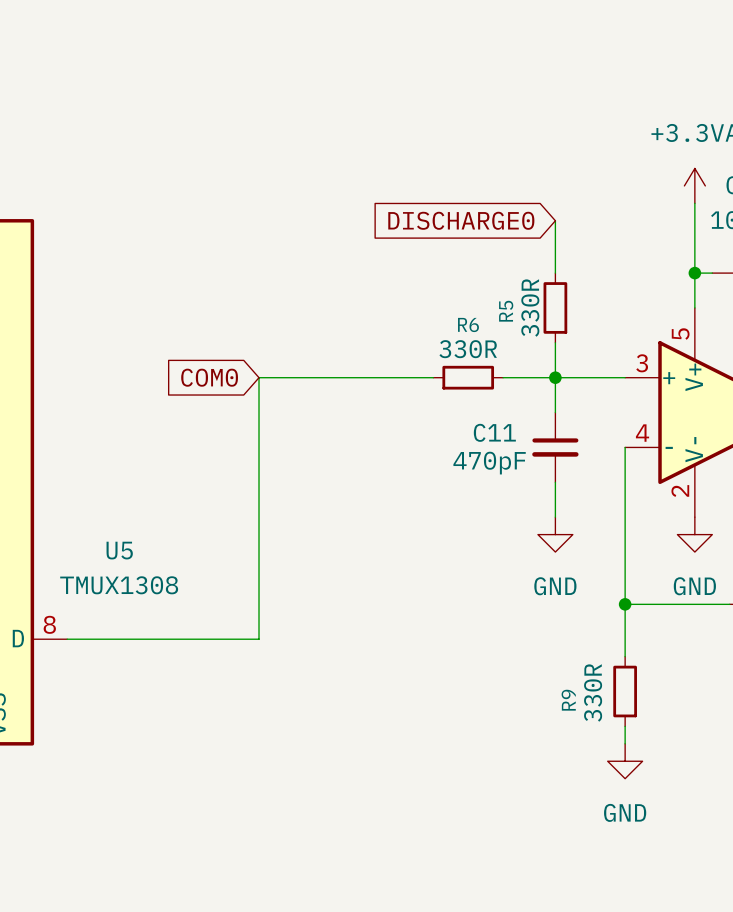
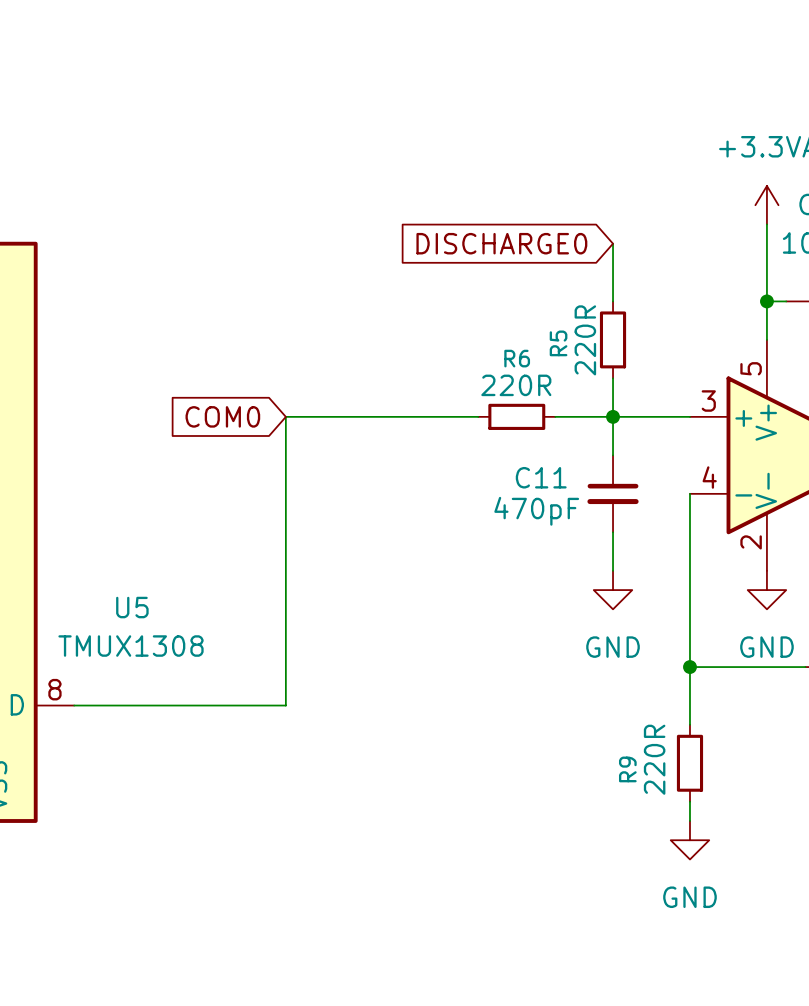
R5 value: 330R (530, 307) -> 220R (585, 340)
R6 value: 330R (468, 349) -> 220R (516, 385)
R9 value: 330R (593, 692) -> 220R (654, 759)

